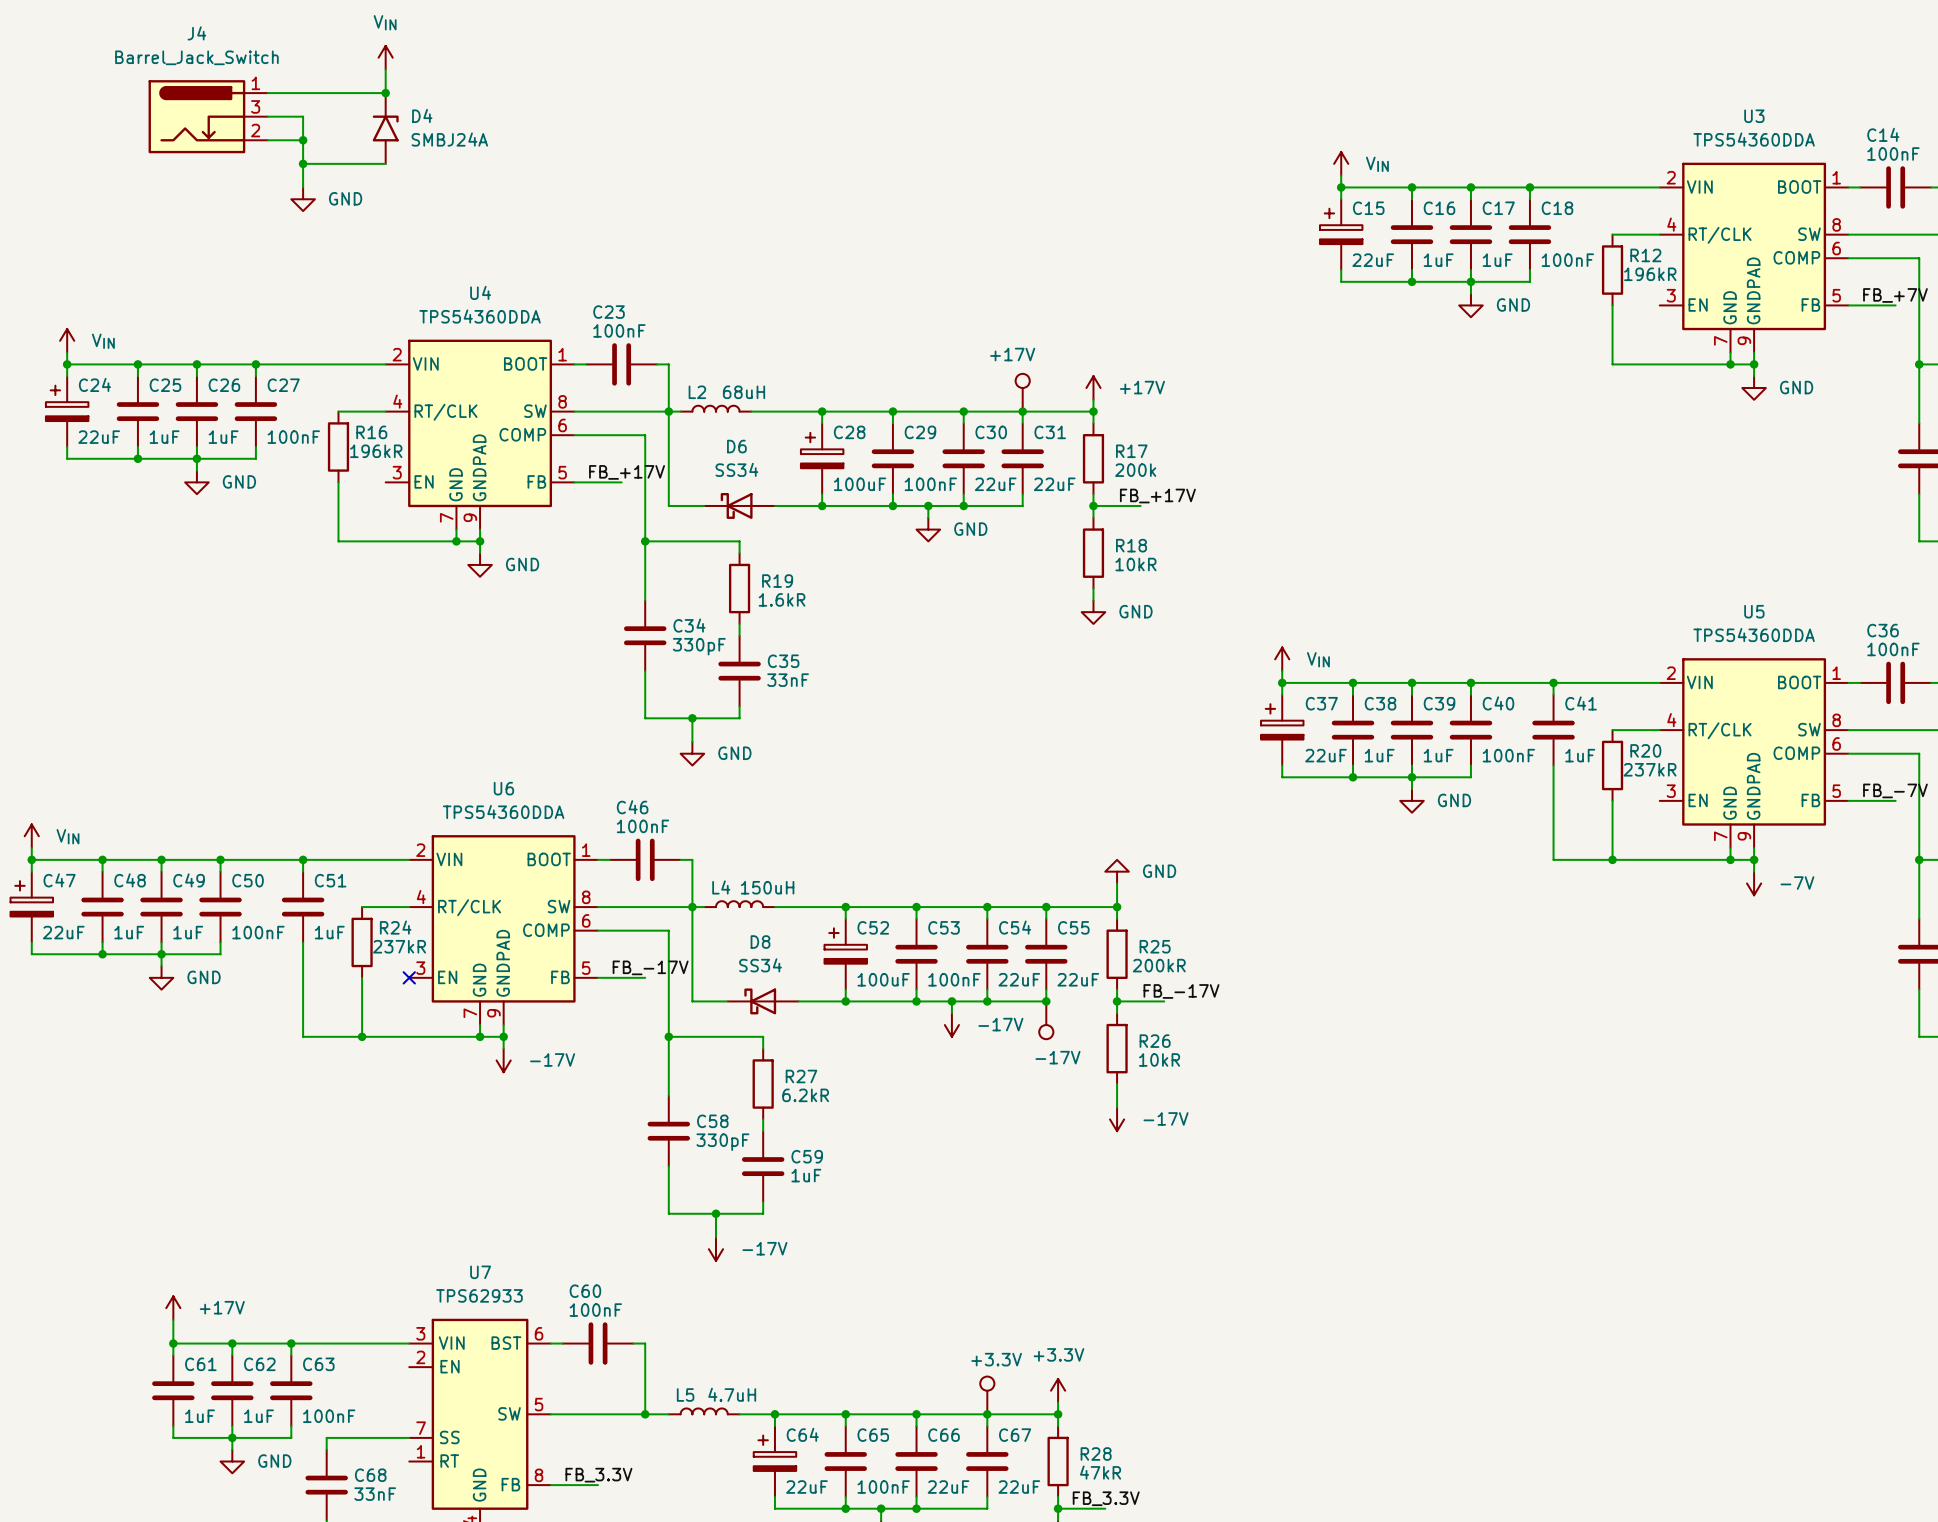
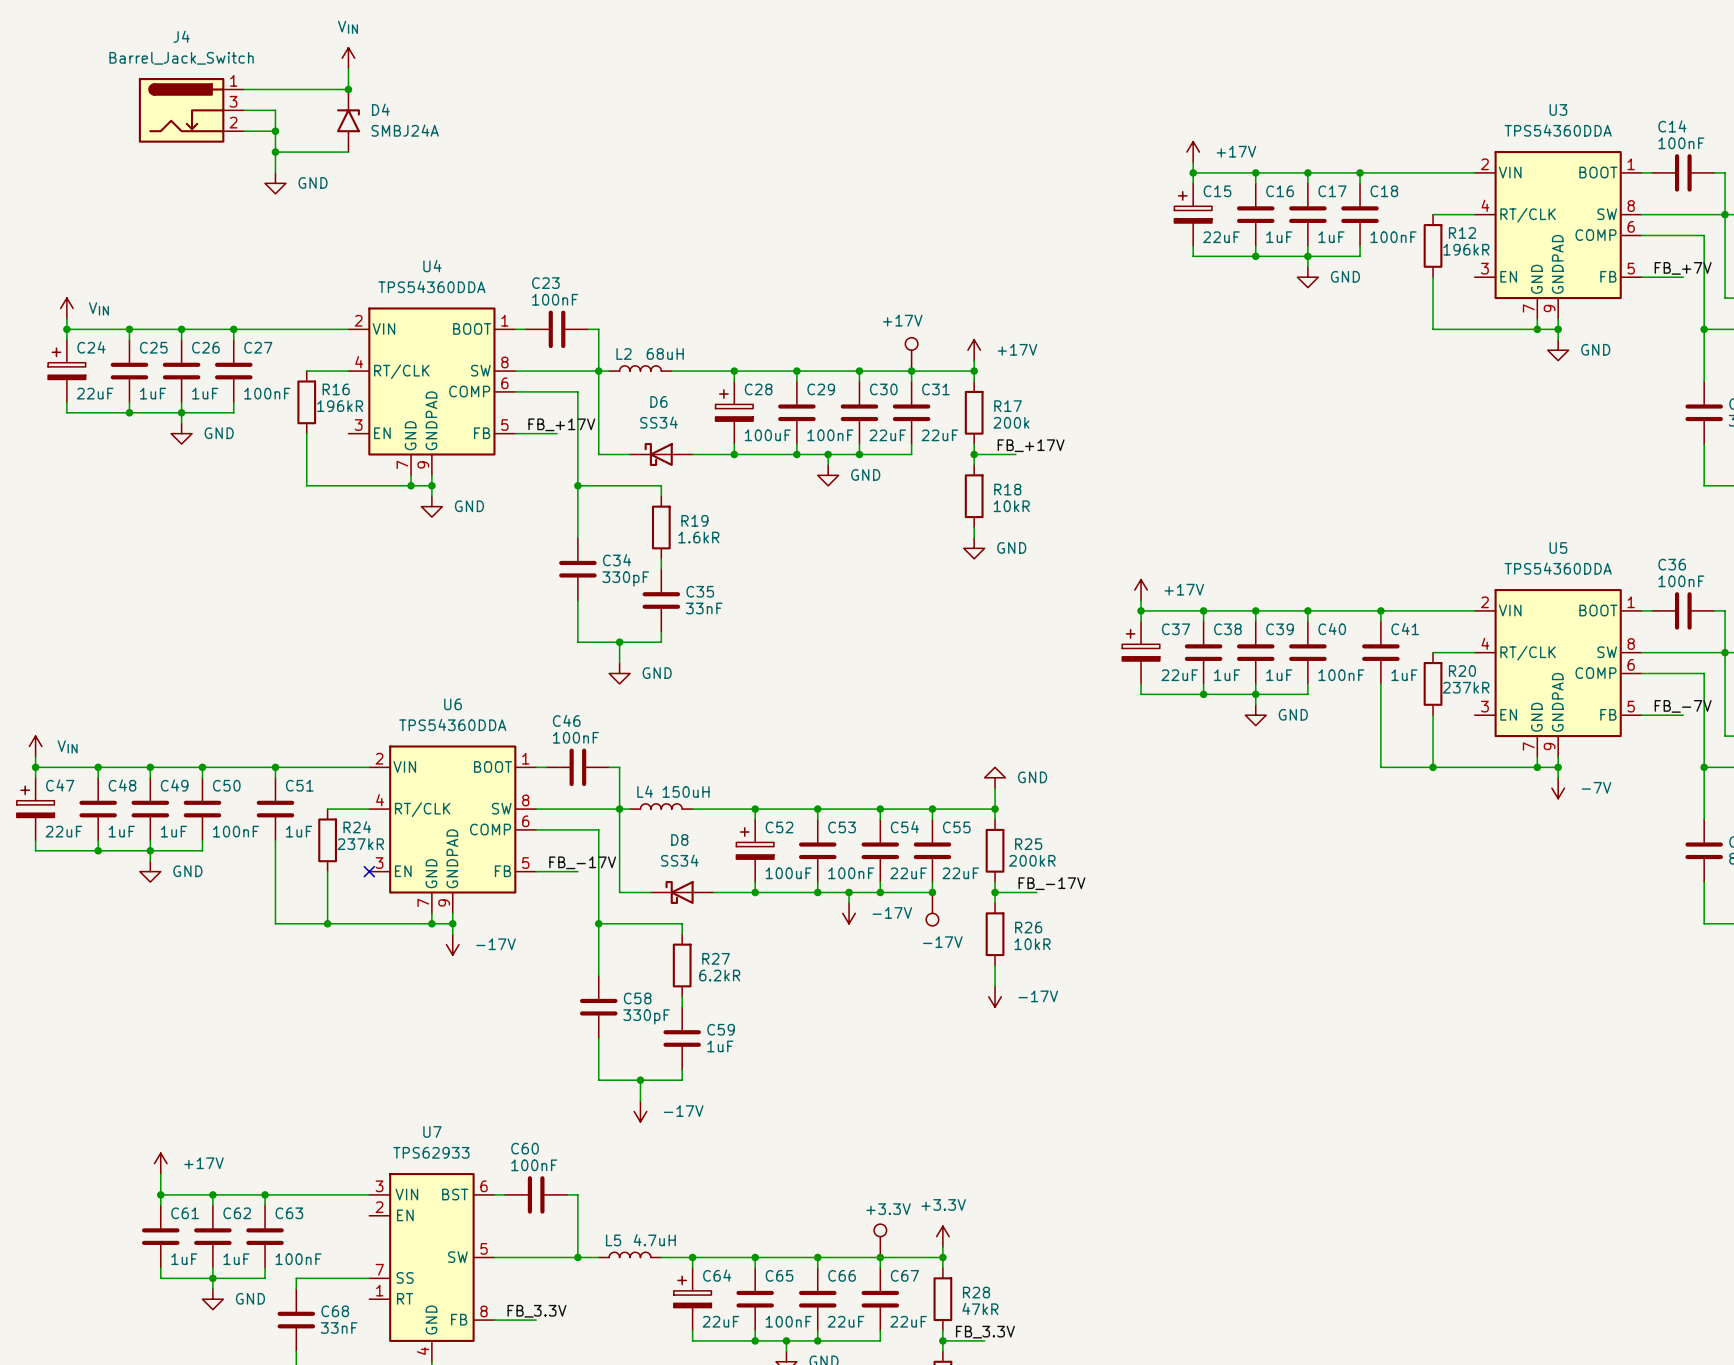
power symbol: VIN (1341, 163) -> +17V (1193, 152)
power symbol: VIN (1282, 659) -> +17V (1141, 590)

